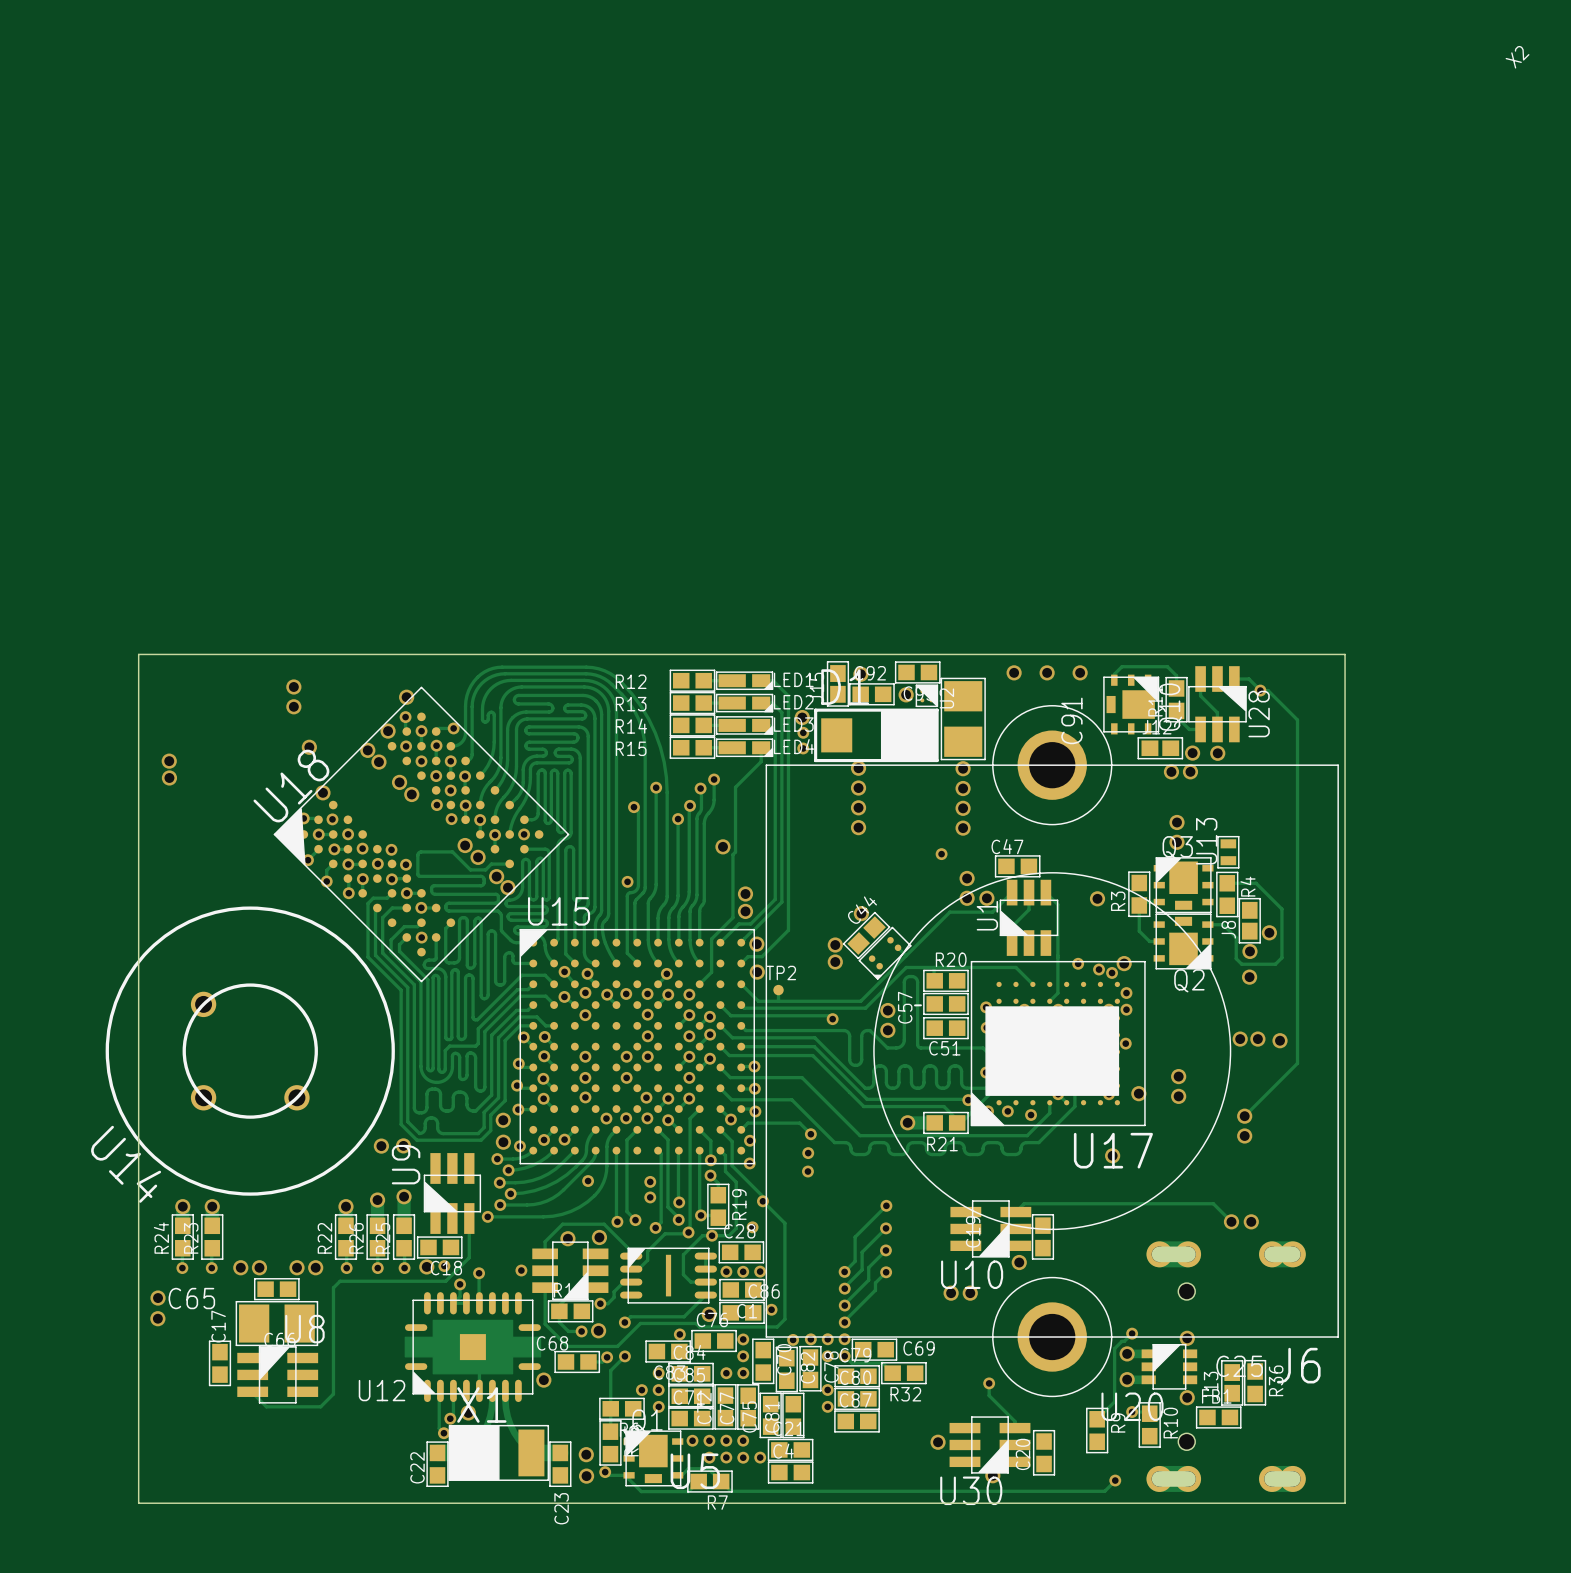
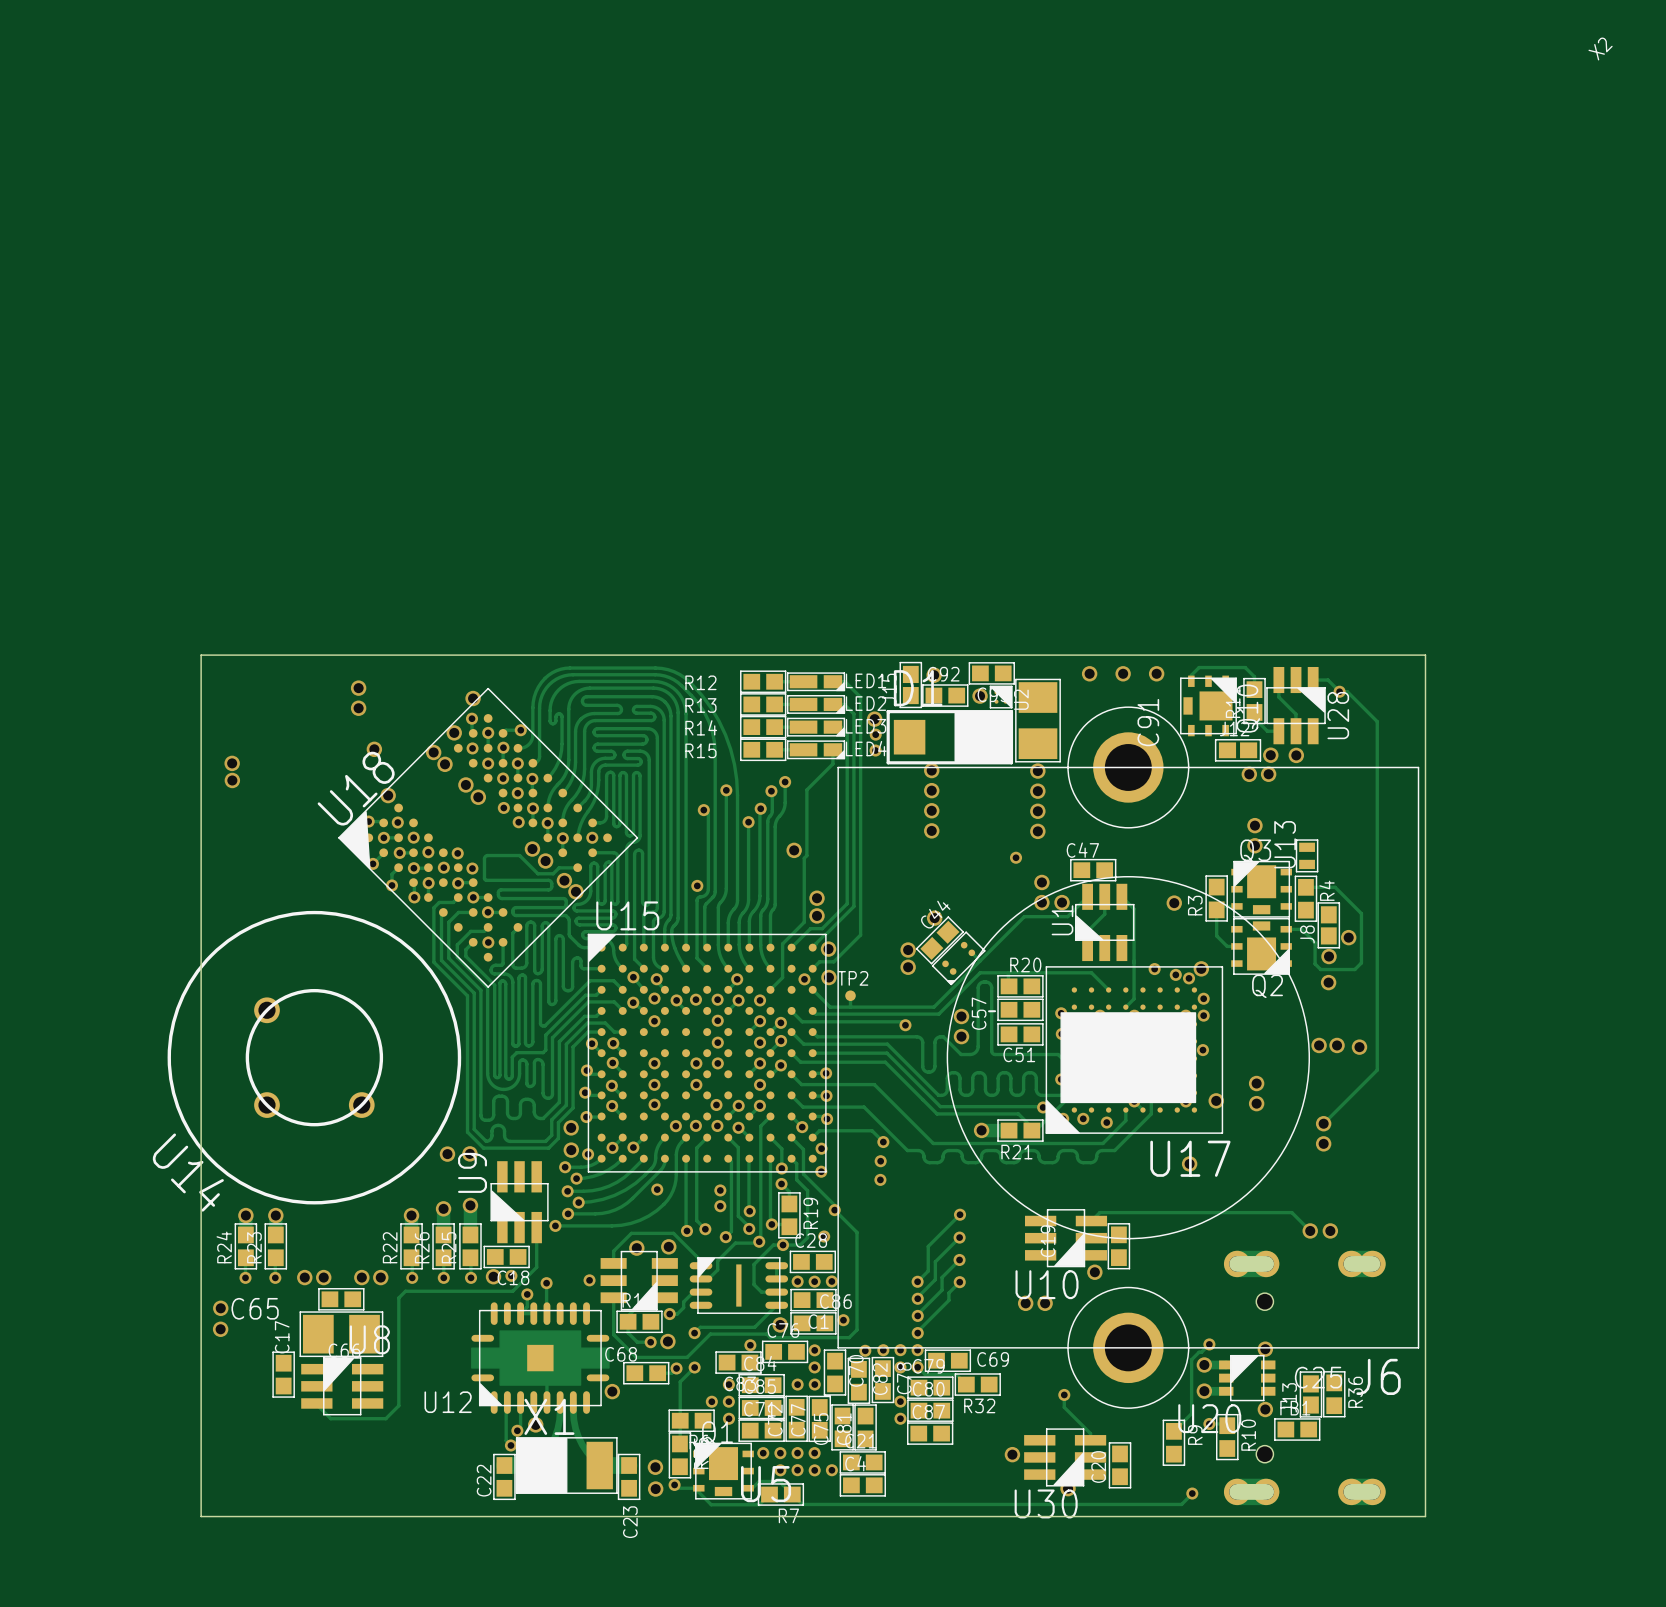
via: none -> (804, 979)

